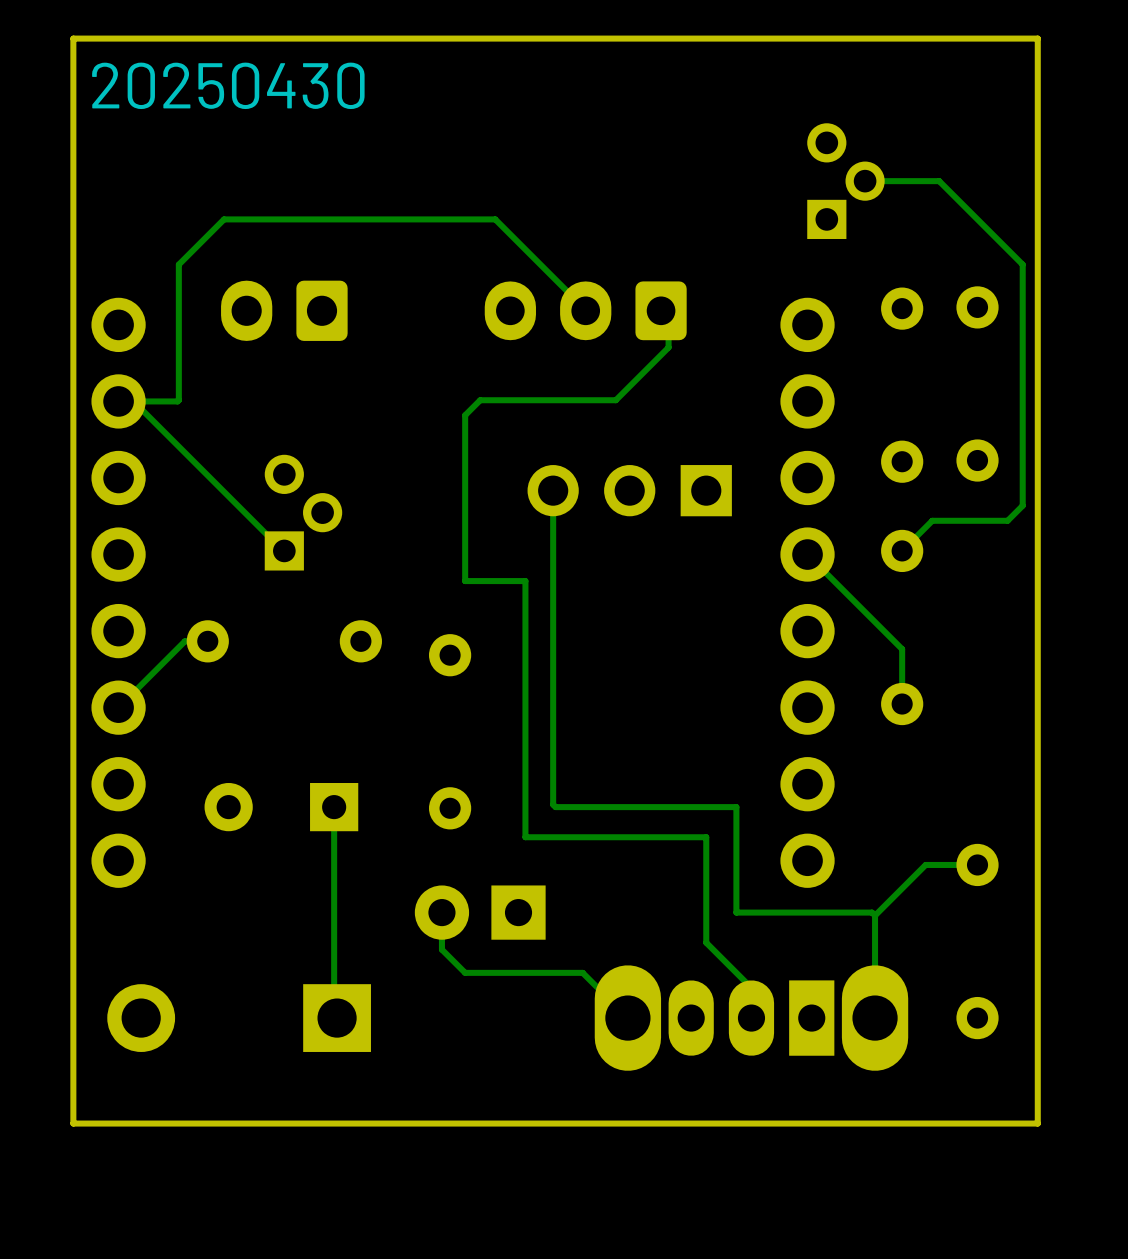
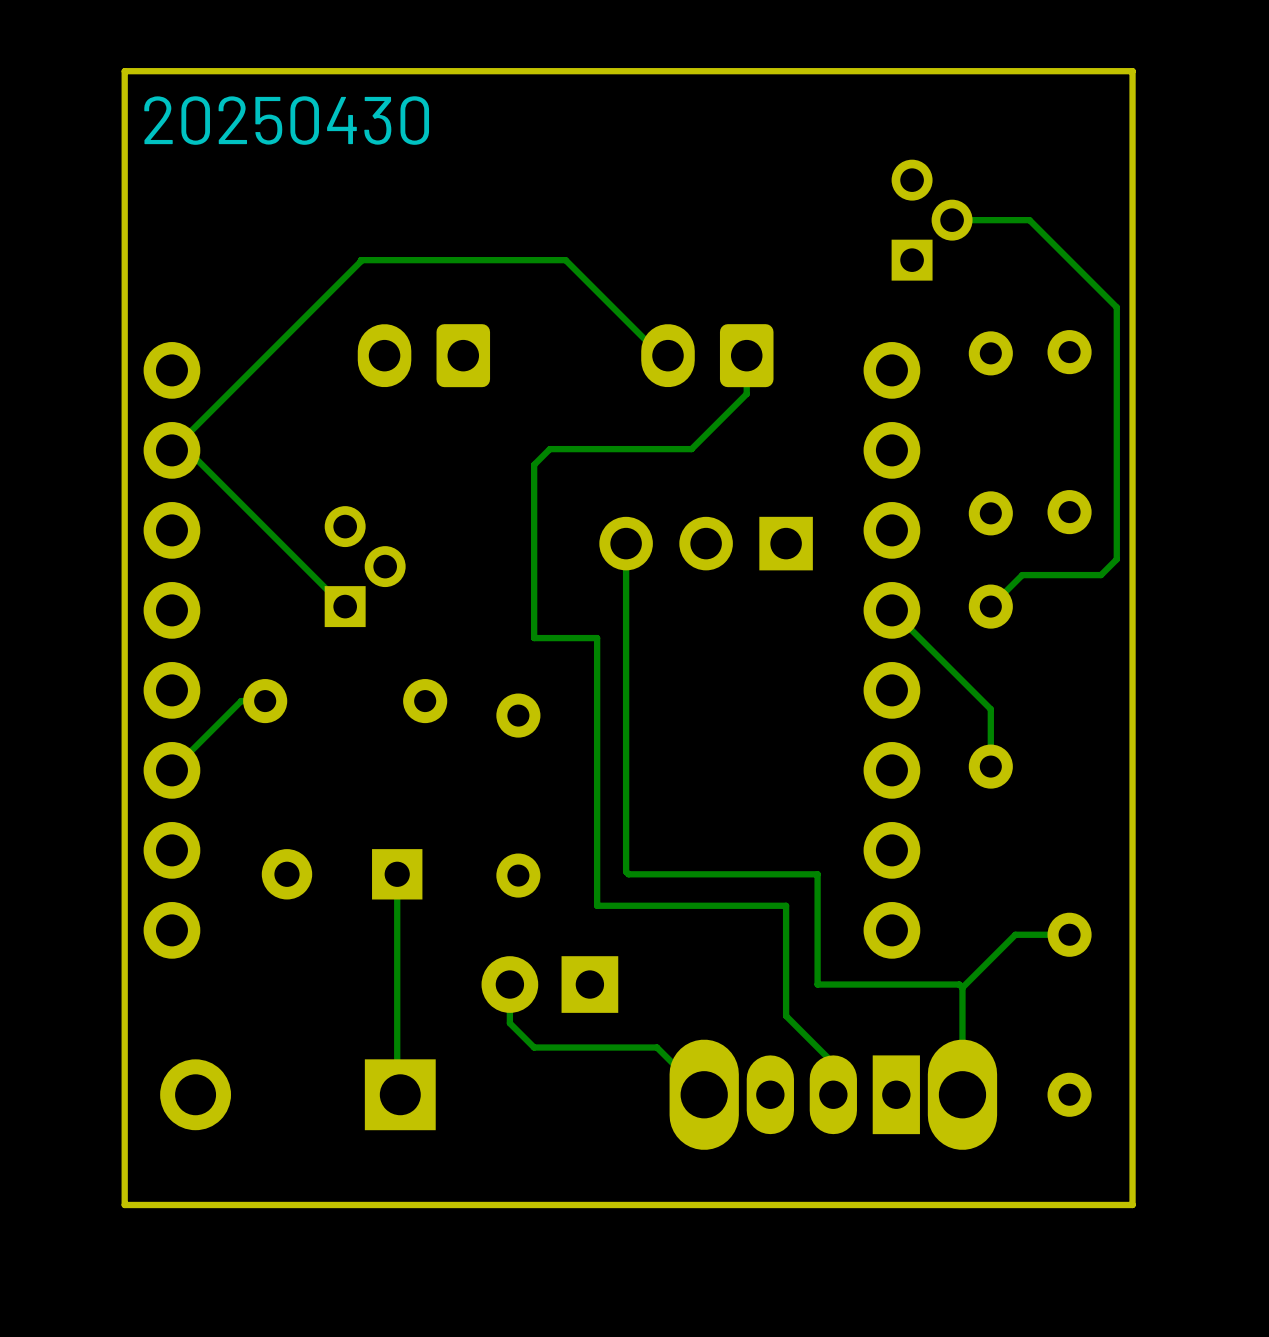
track: (299, 219) (224, 219) (178, 264) (178, 400) (118, 401) -> (360, 260) (171, 450)
part position: (284, 310) -> (423, 355)
part: (585, 310) -> none
part: none -> (707, 355)

